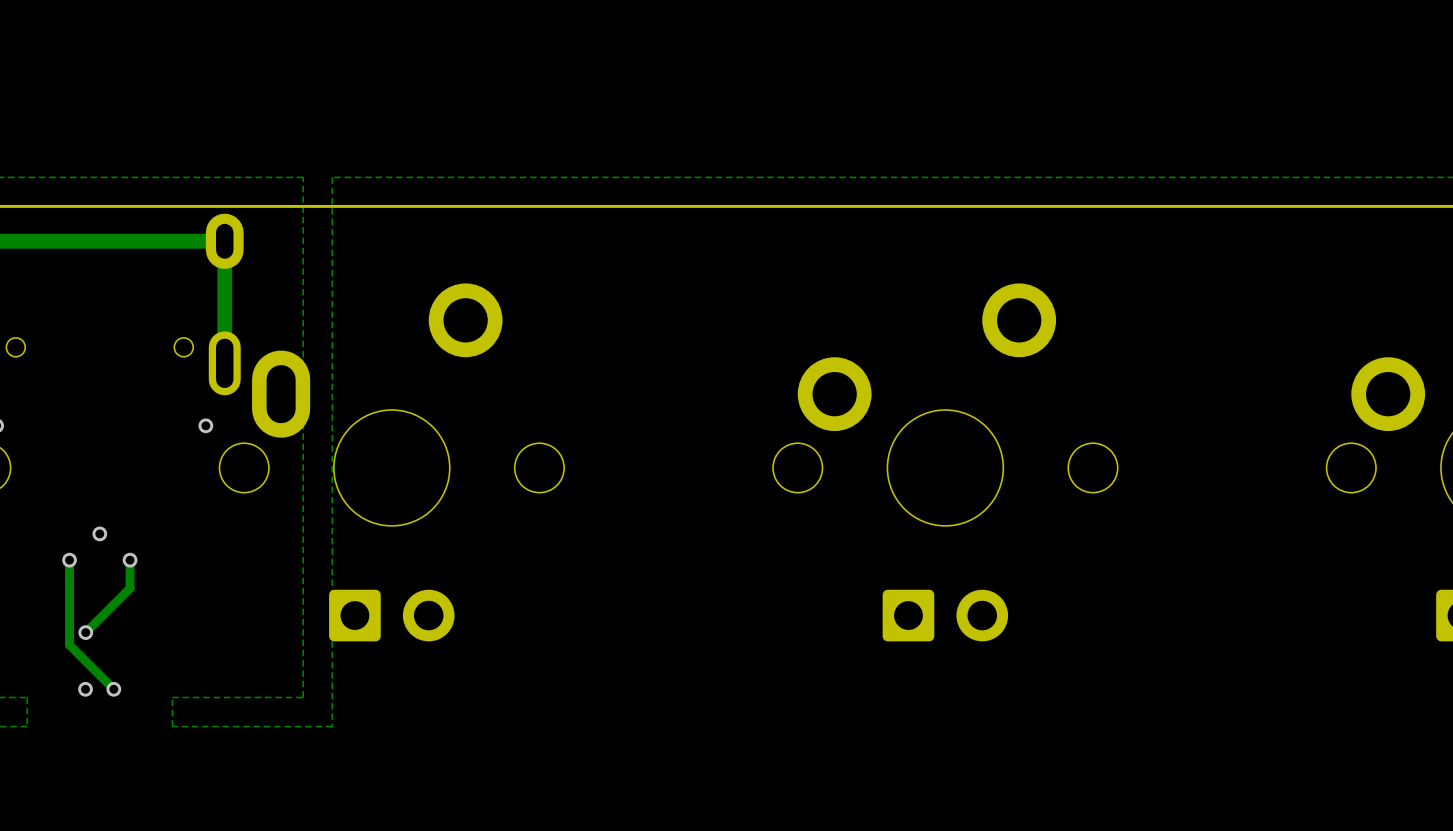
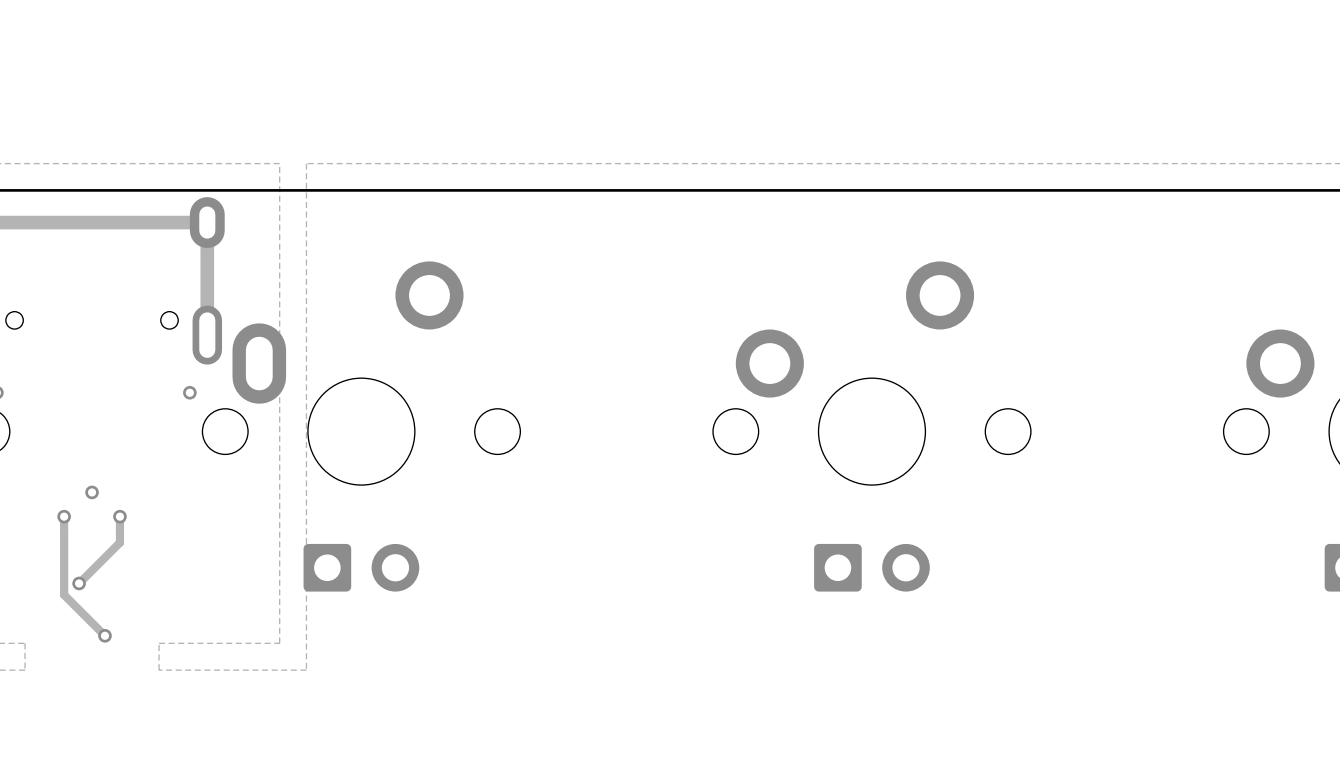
via: (85, 689) -> none

